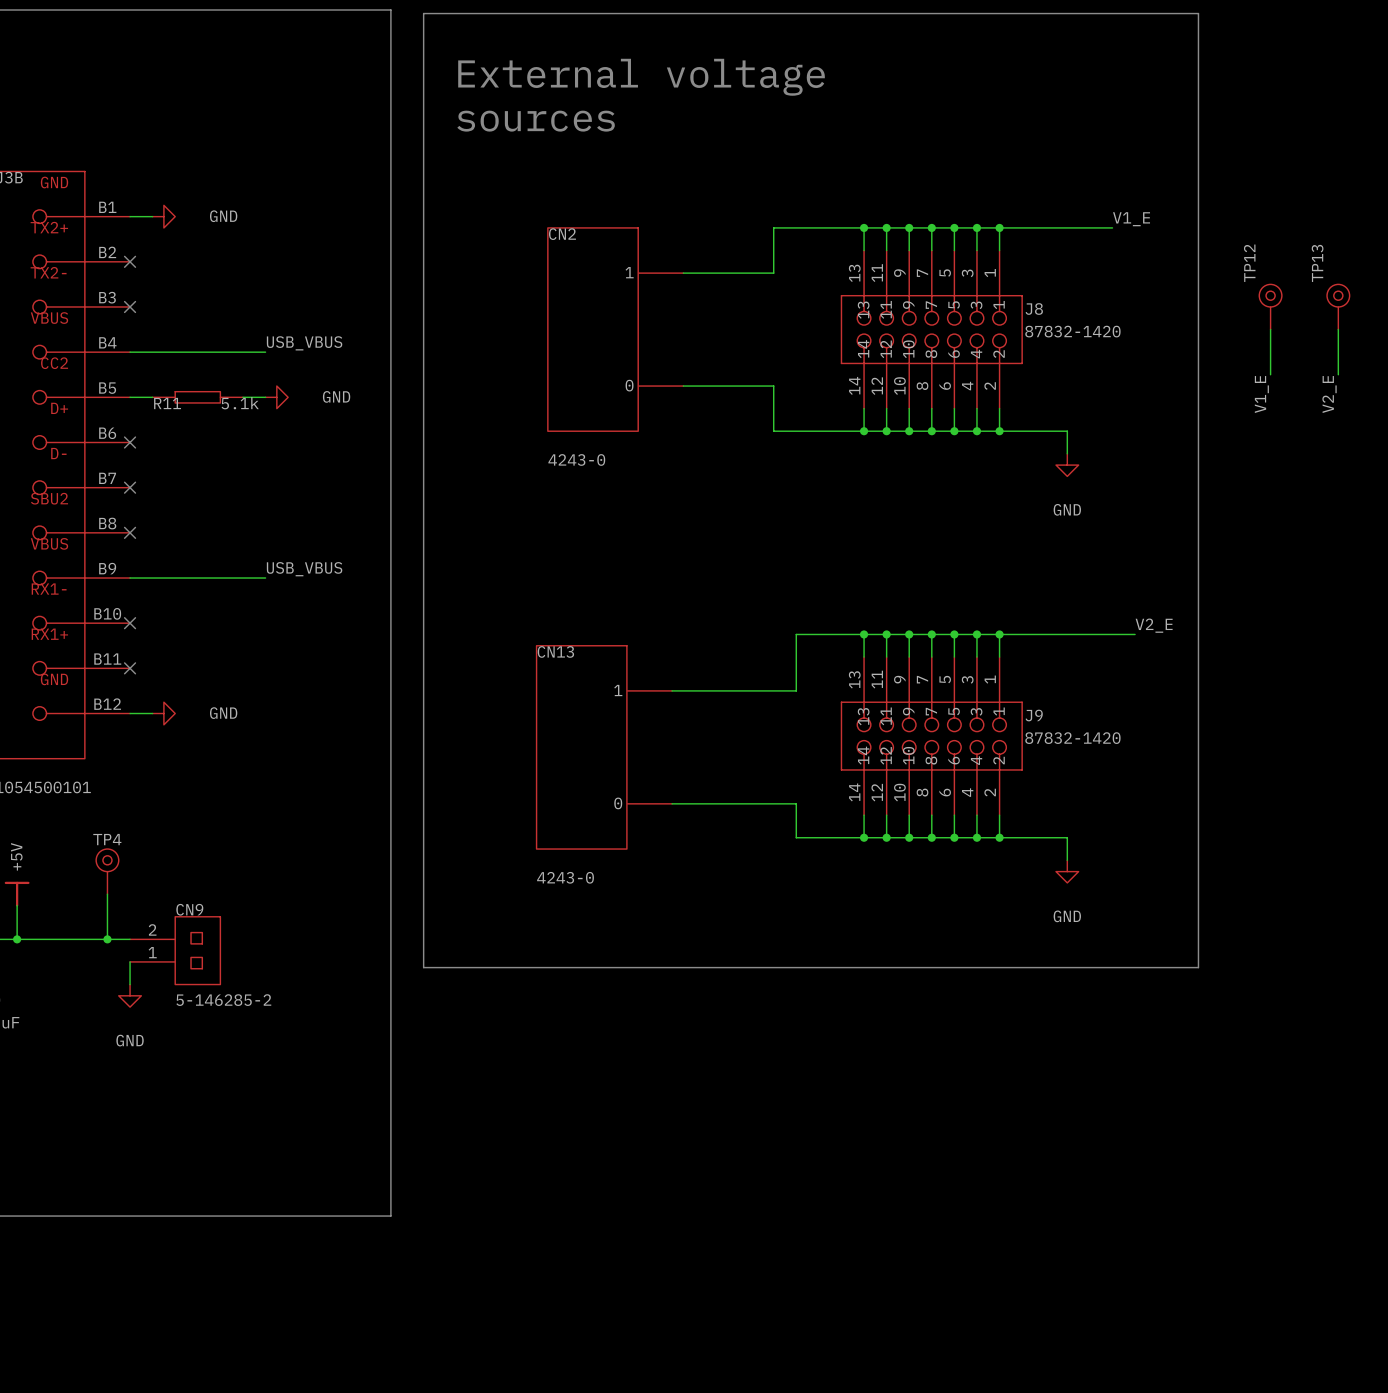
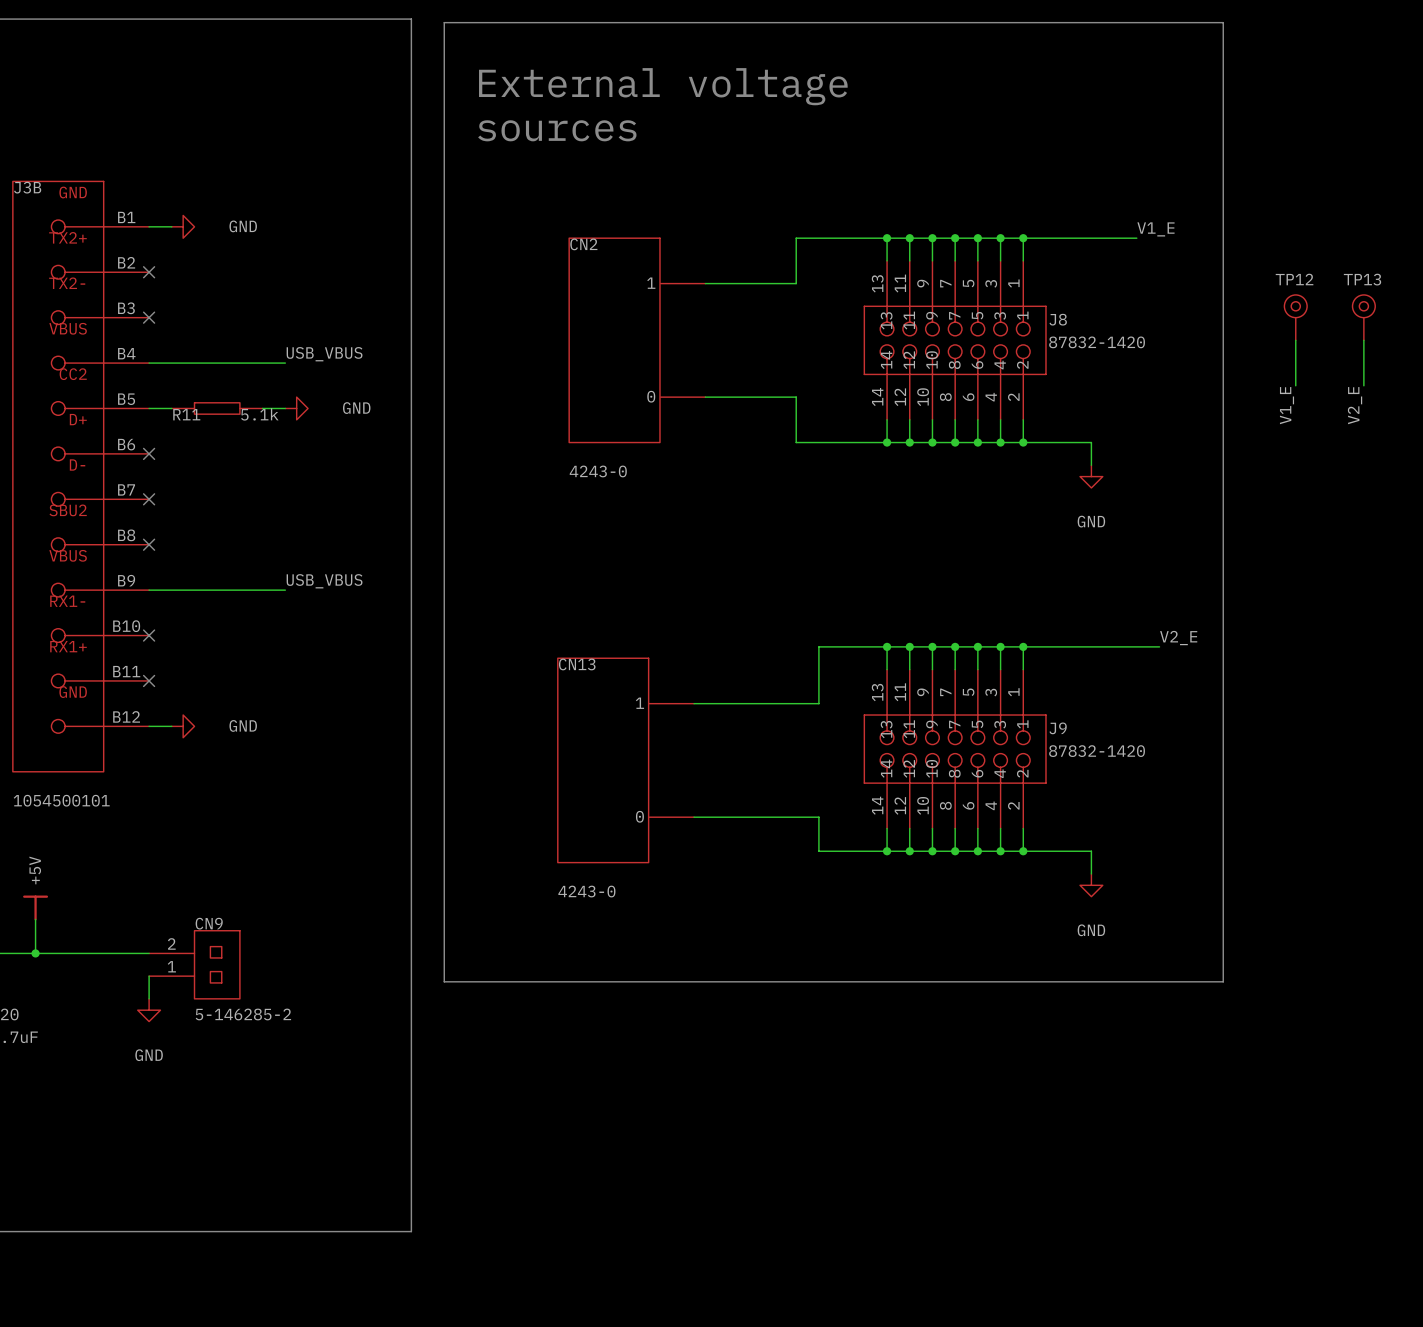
TP12 name rotation: 0° (1249, 263) -> 90° clockwise (1294, 279)
TP13 name rotation: 0° (1317, 263) -> 90° clockwise (1362, 279)
TP4: (107, 871) -> none
wire: (107, 894) (107, 939) -> none
junction: (107, 939) -> none

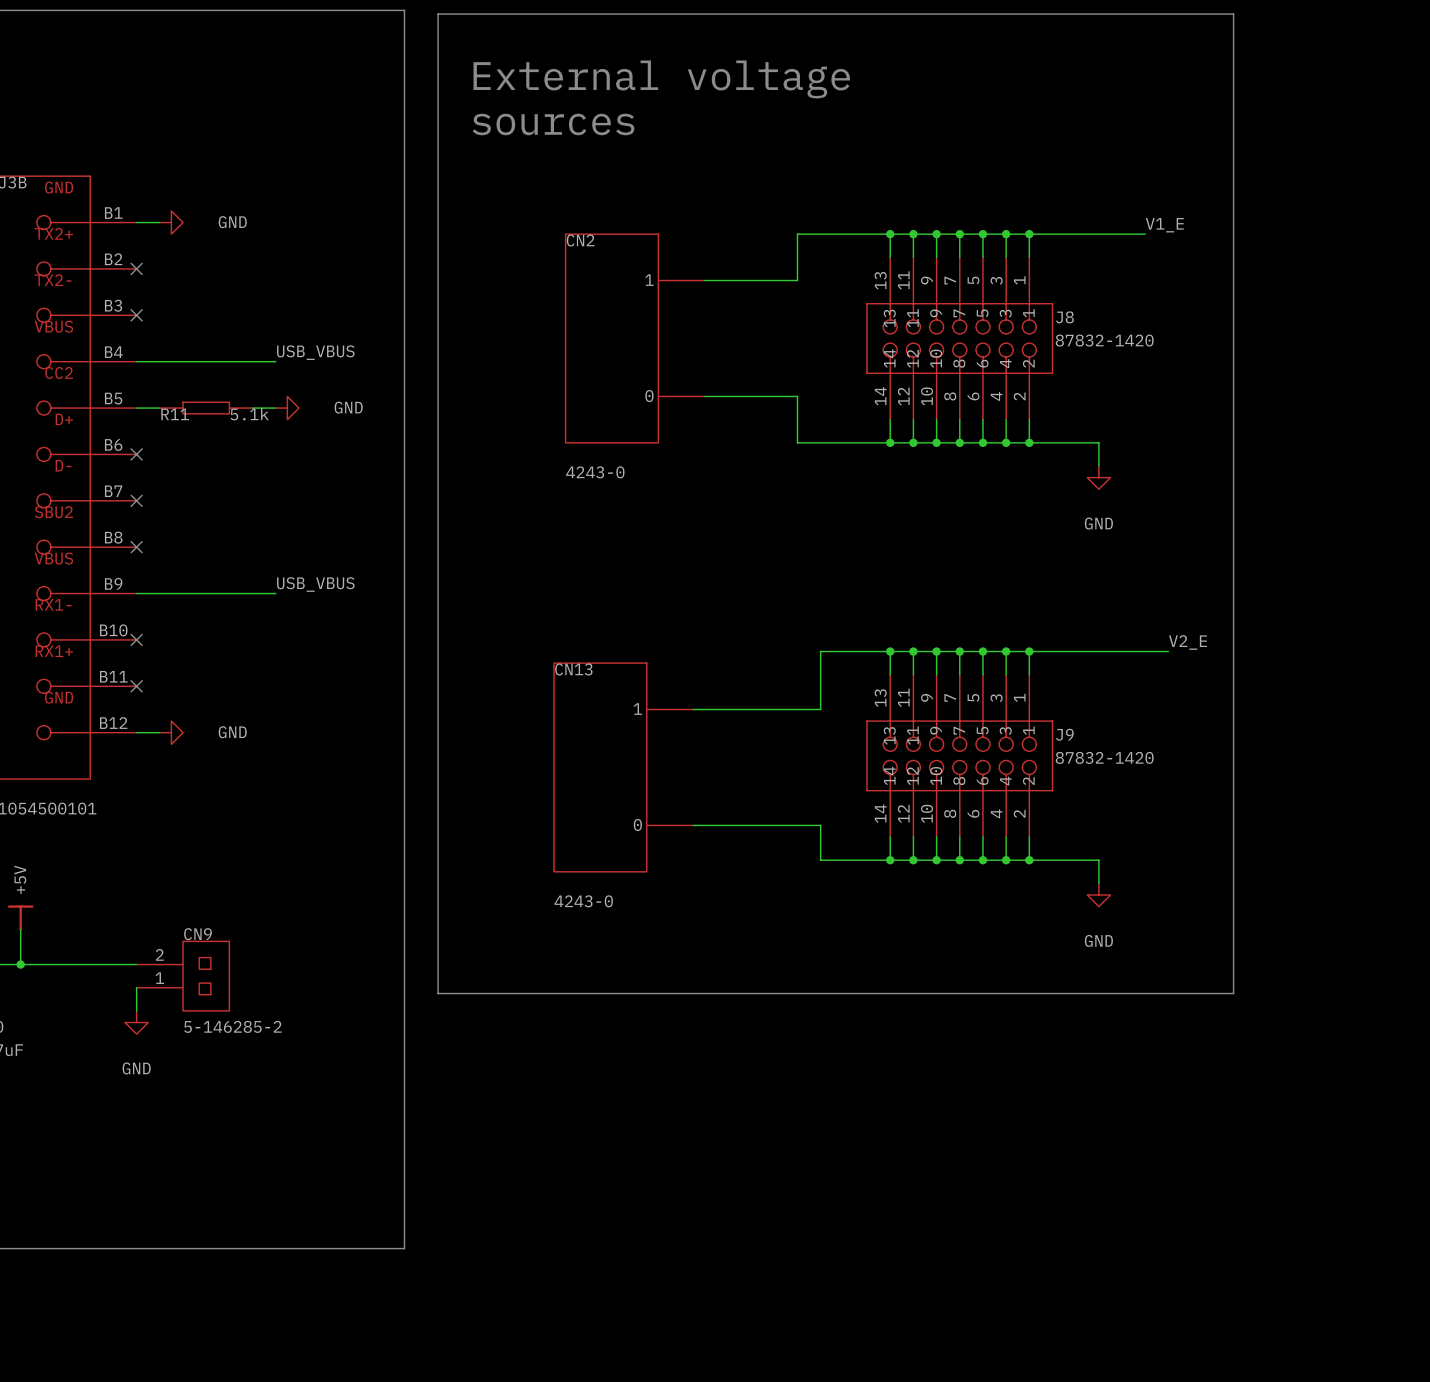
TP12: (1295, 317) -> none
TP13: (1363, 317) -> none
wire: (1295, 340) (1295, 385) -> none
wire: (1363, 340) (1363, 385) -> none
label: V1_E (1287, 405) -> none
label: V2_E (1355, 405) -> none

